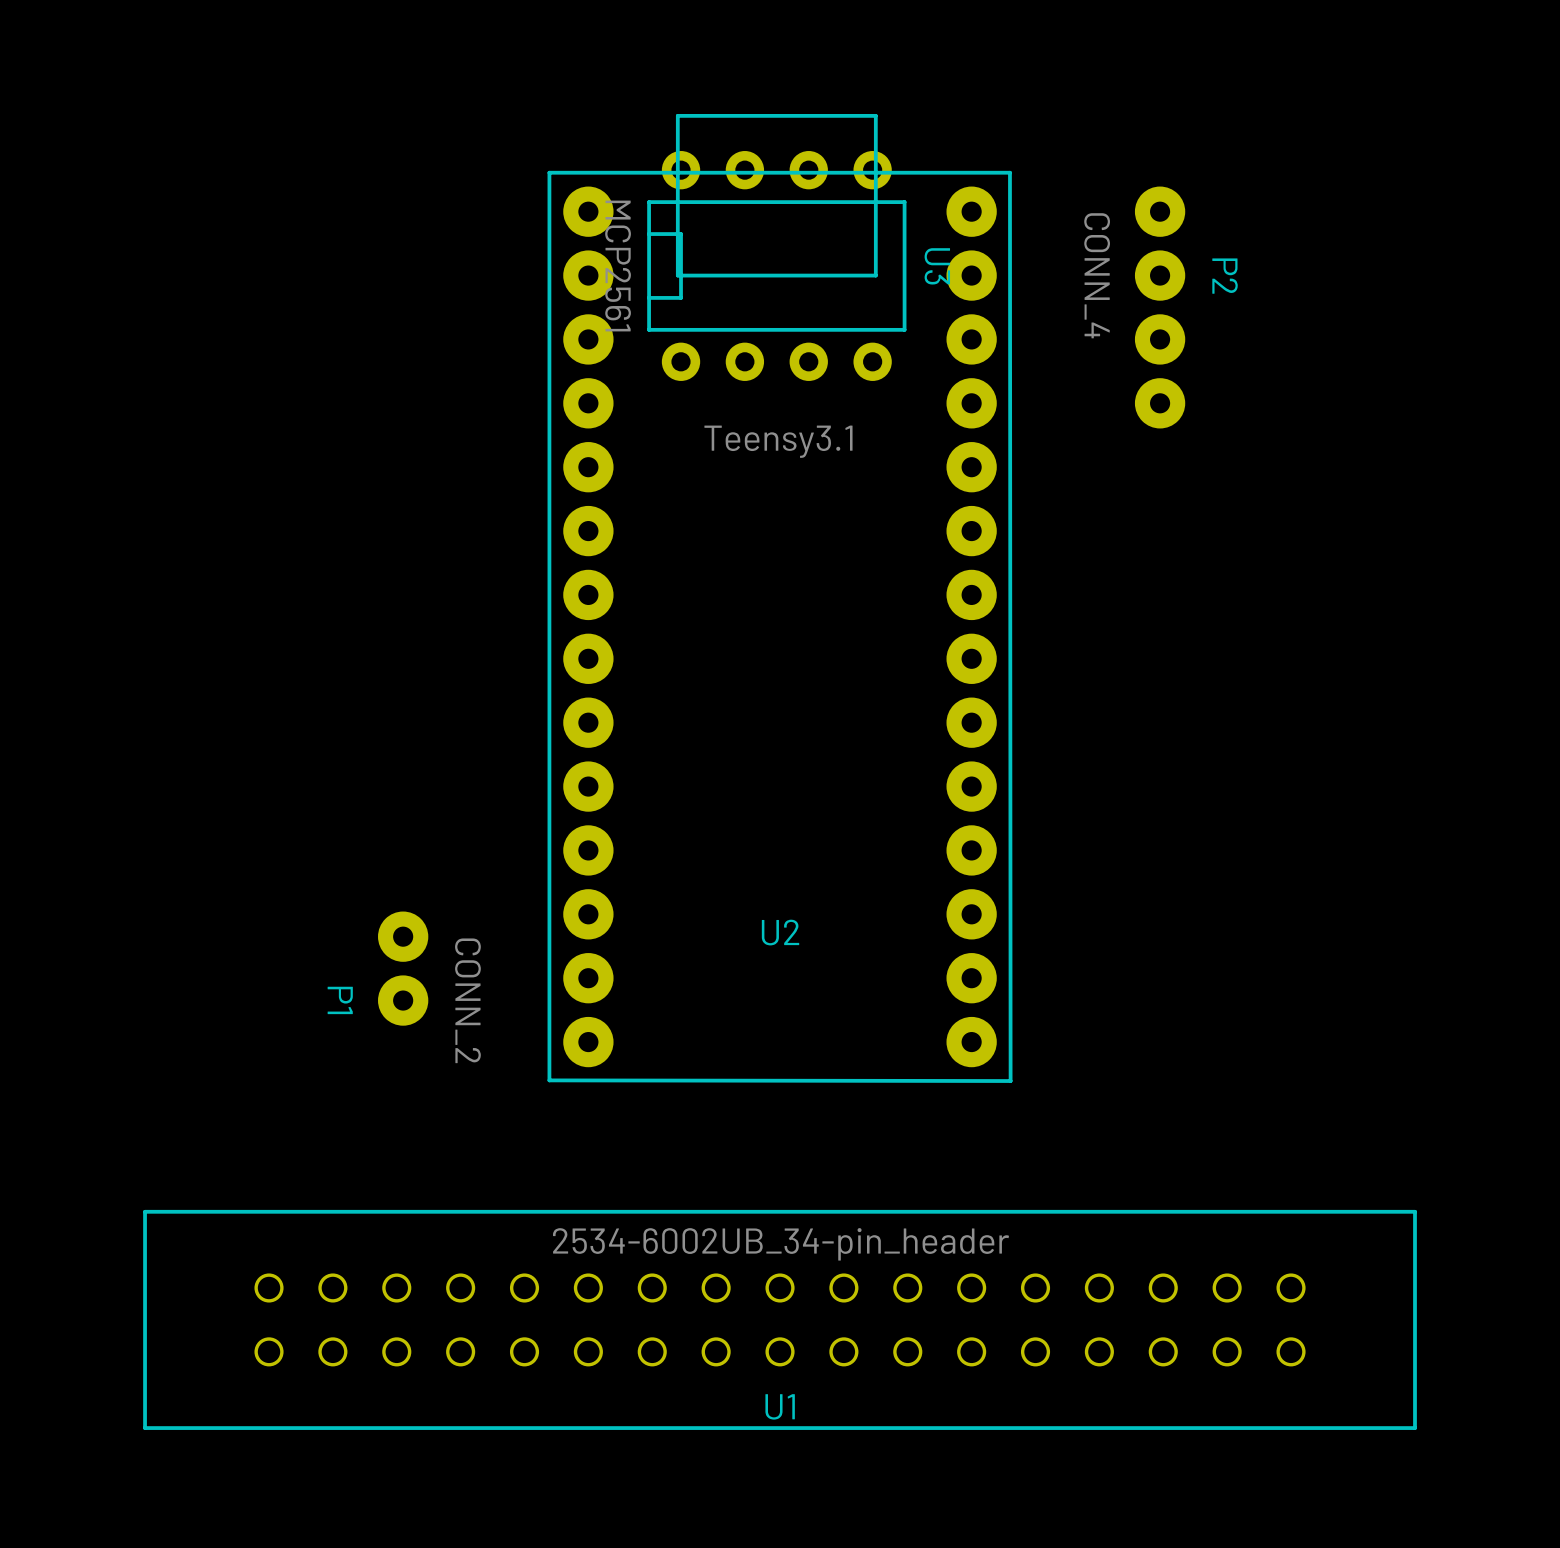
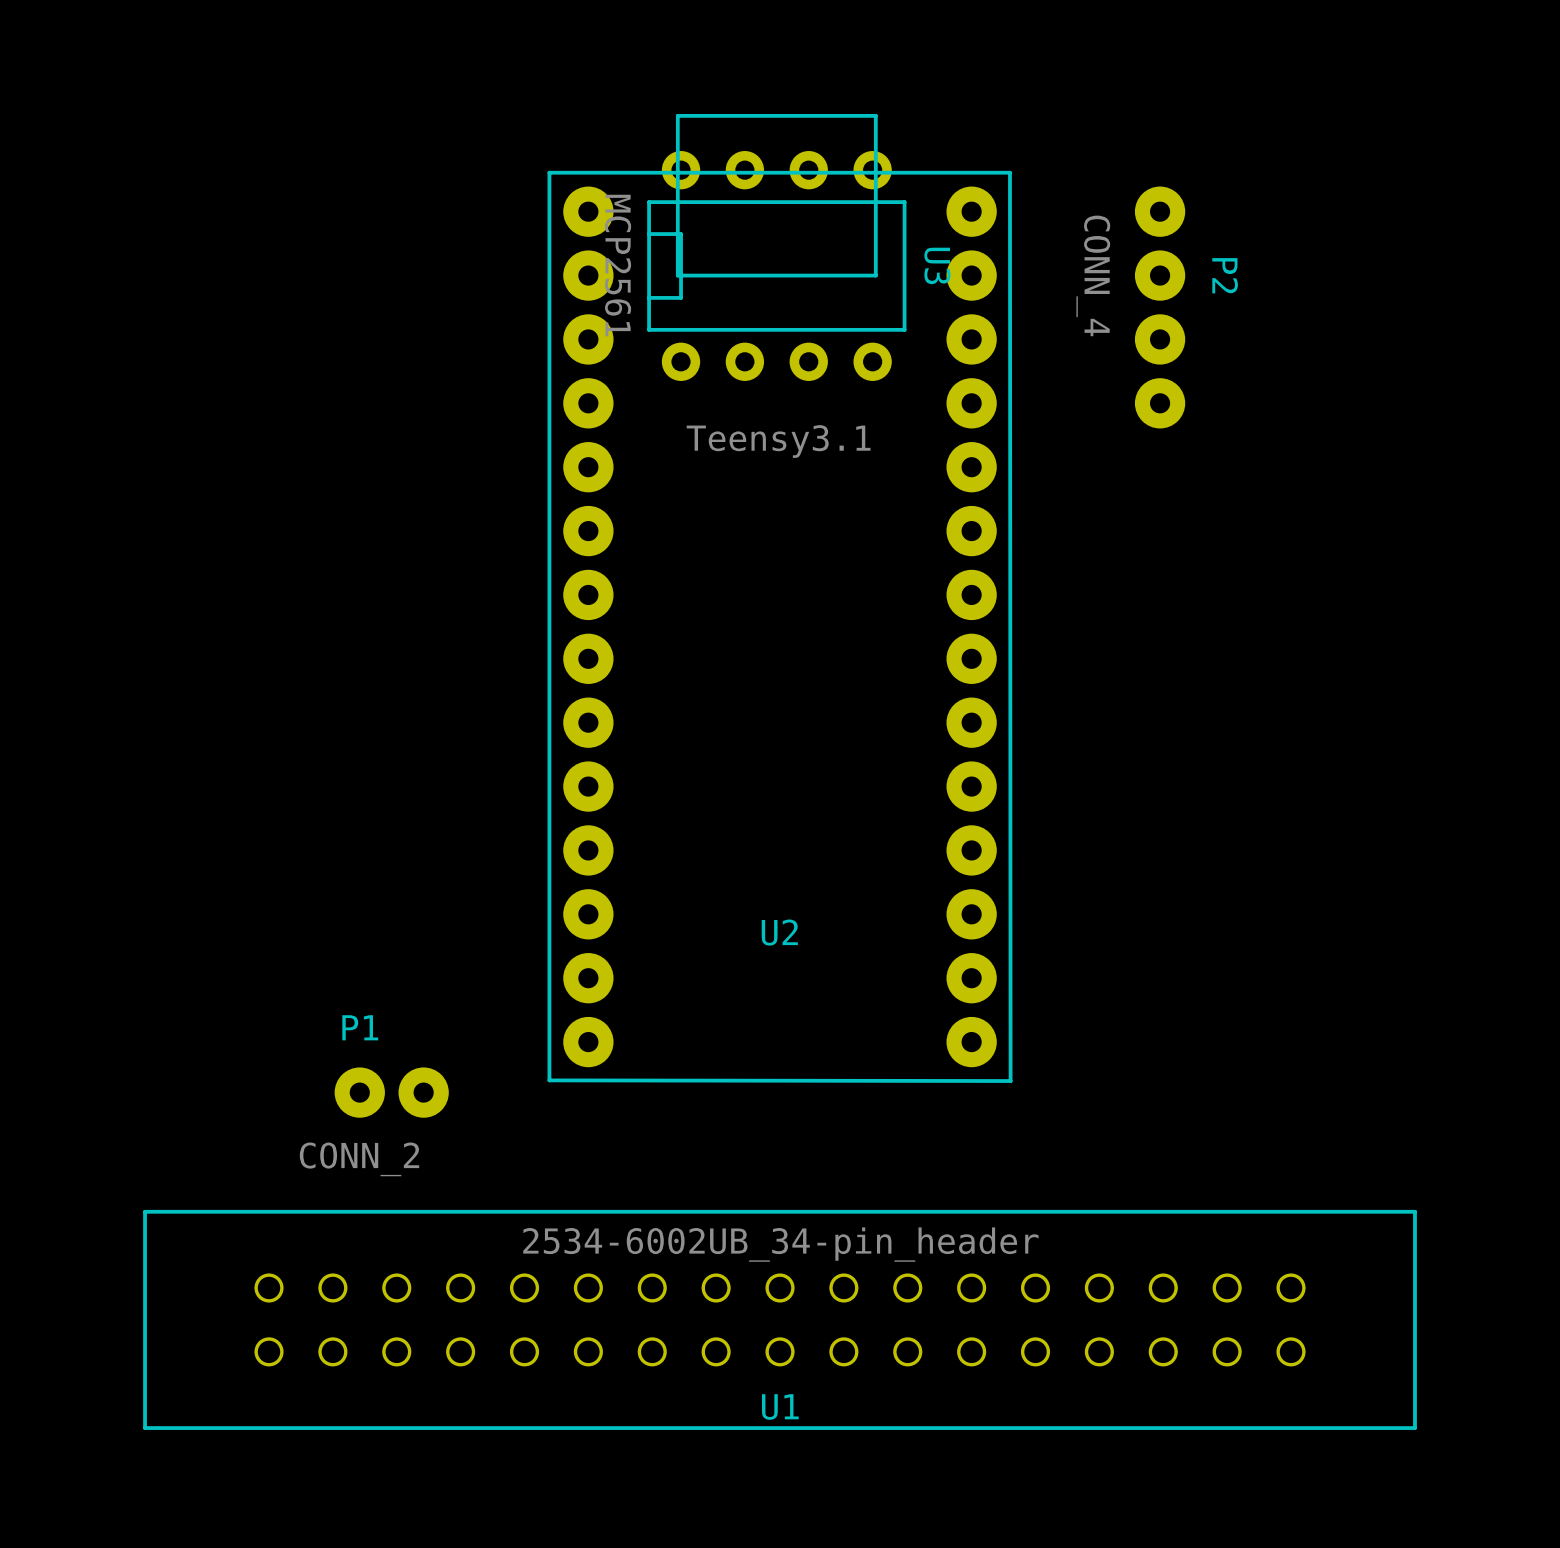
P1 rotation: 0° (403, 968) -> 90° clockwise (391, 1092)
P1 position: (403, 968) -> (391, 1092)

